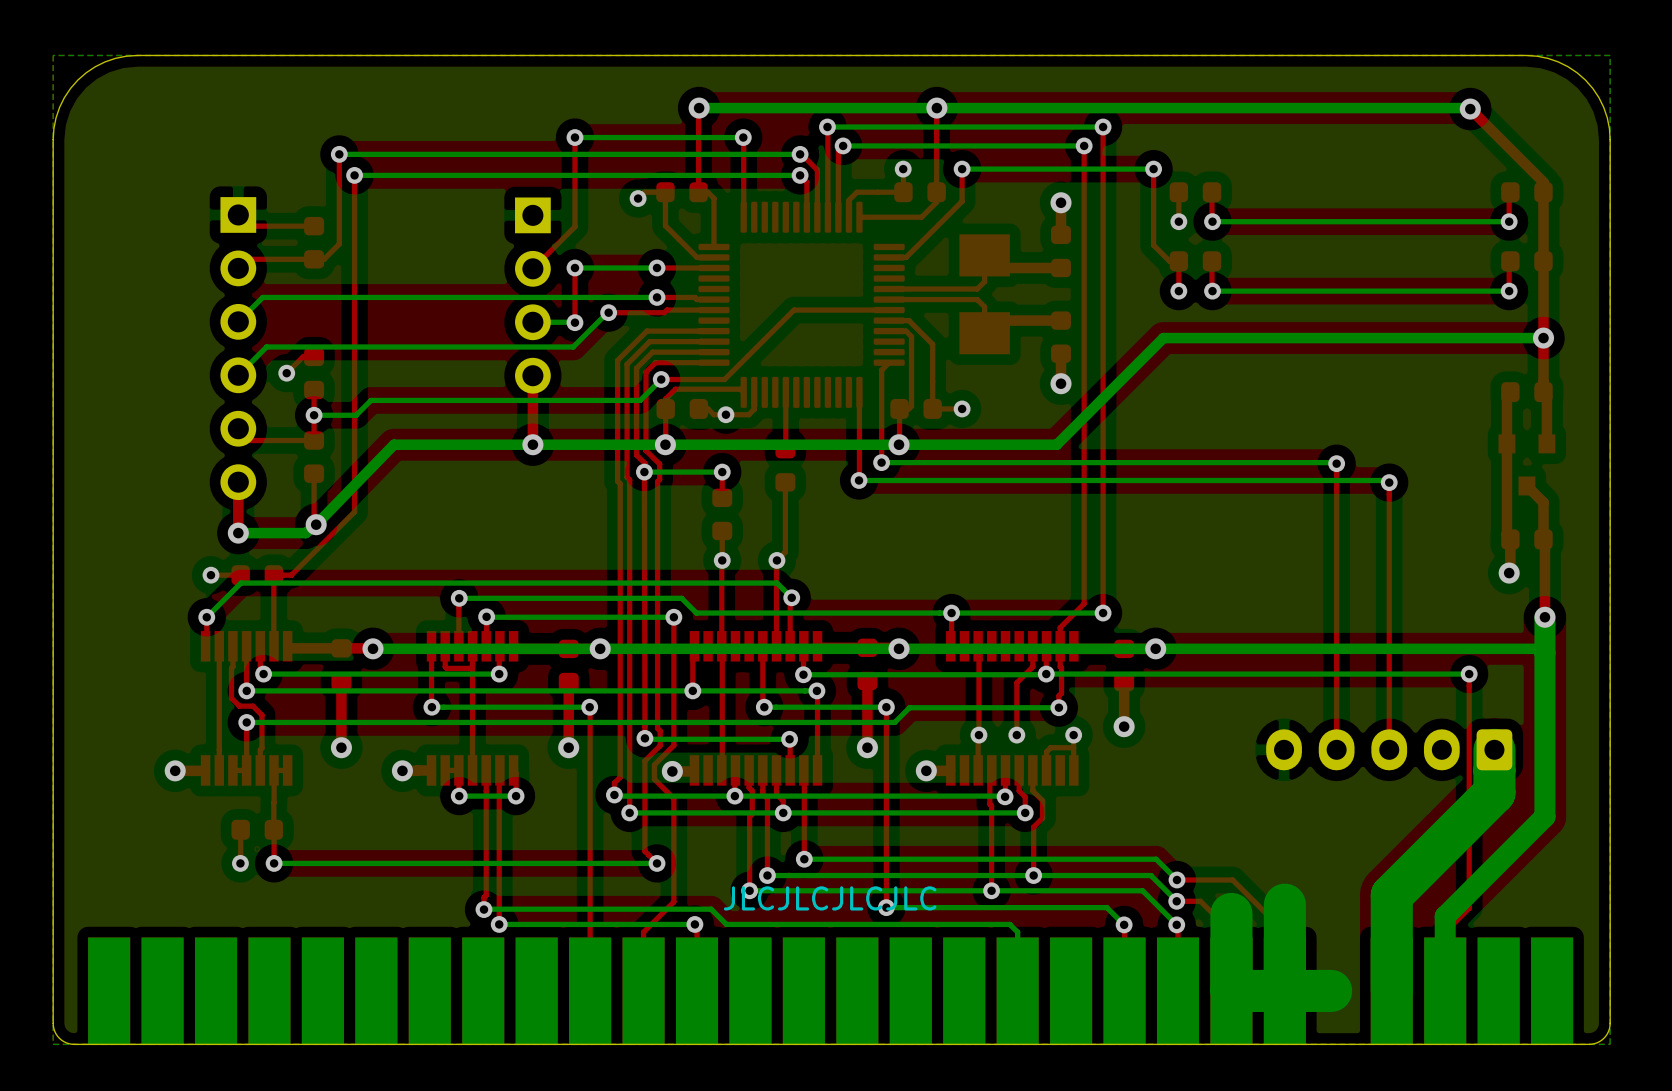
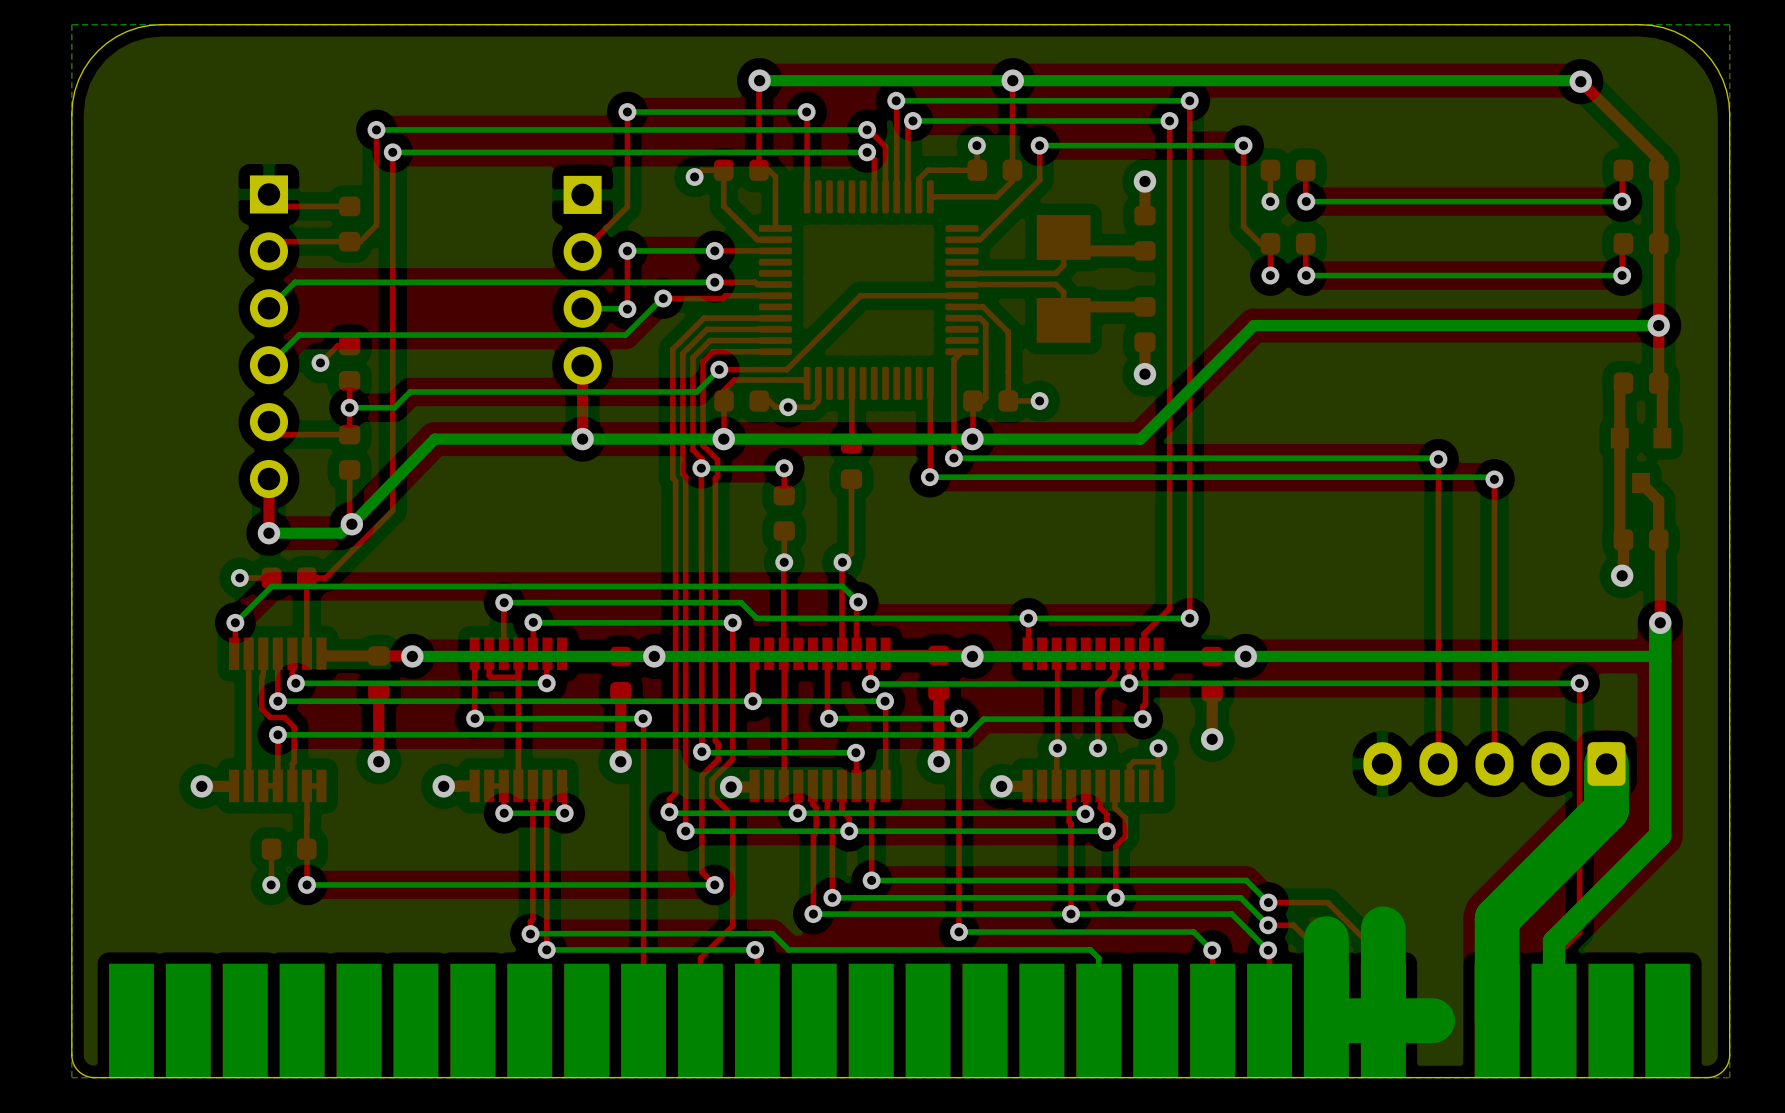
text: JLCJLCJLCJLC (830, 898) -> none

